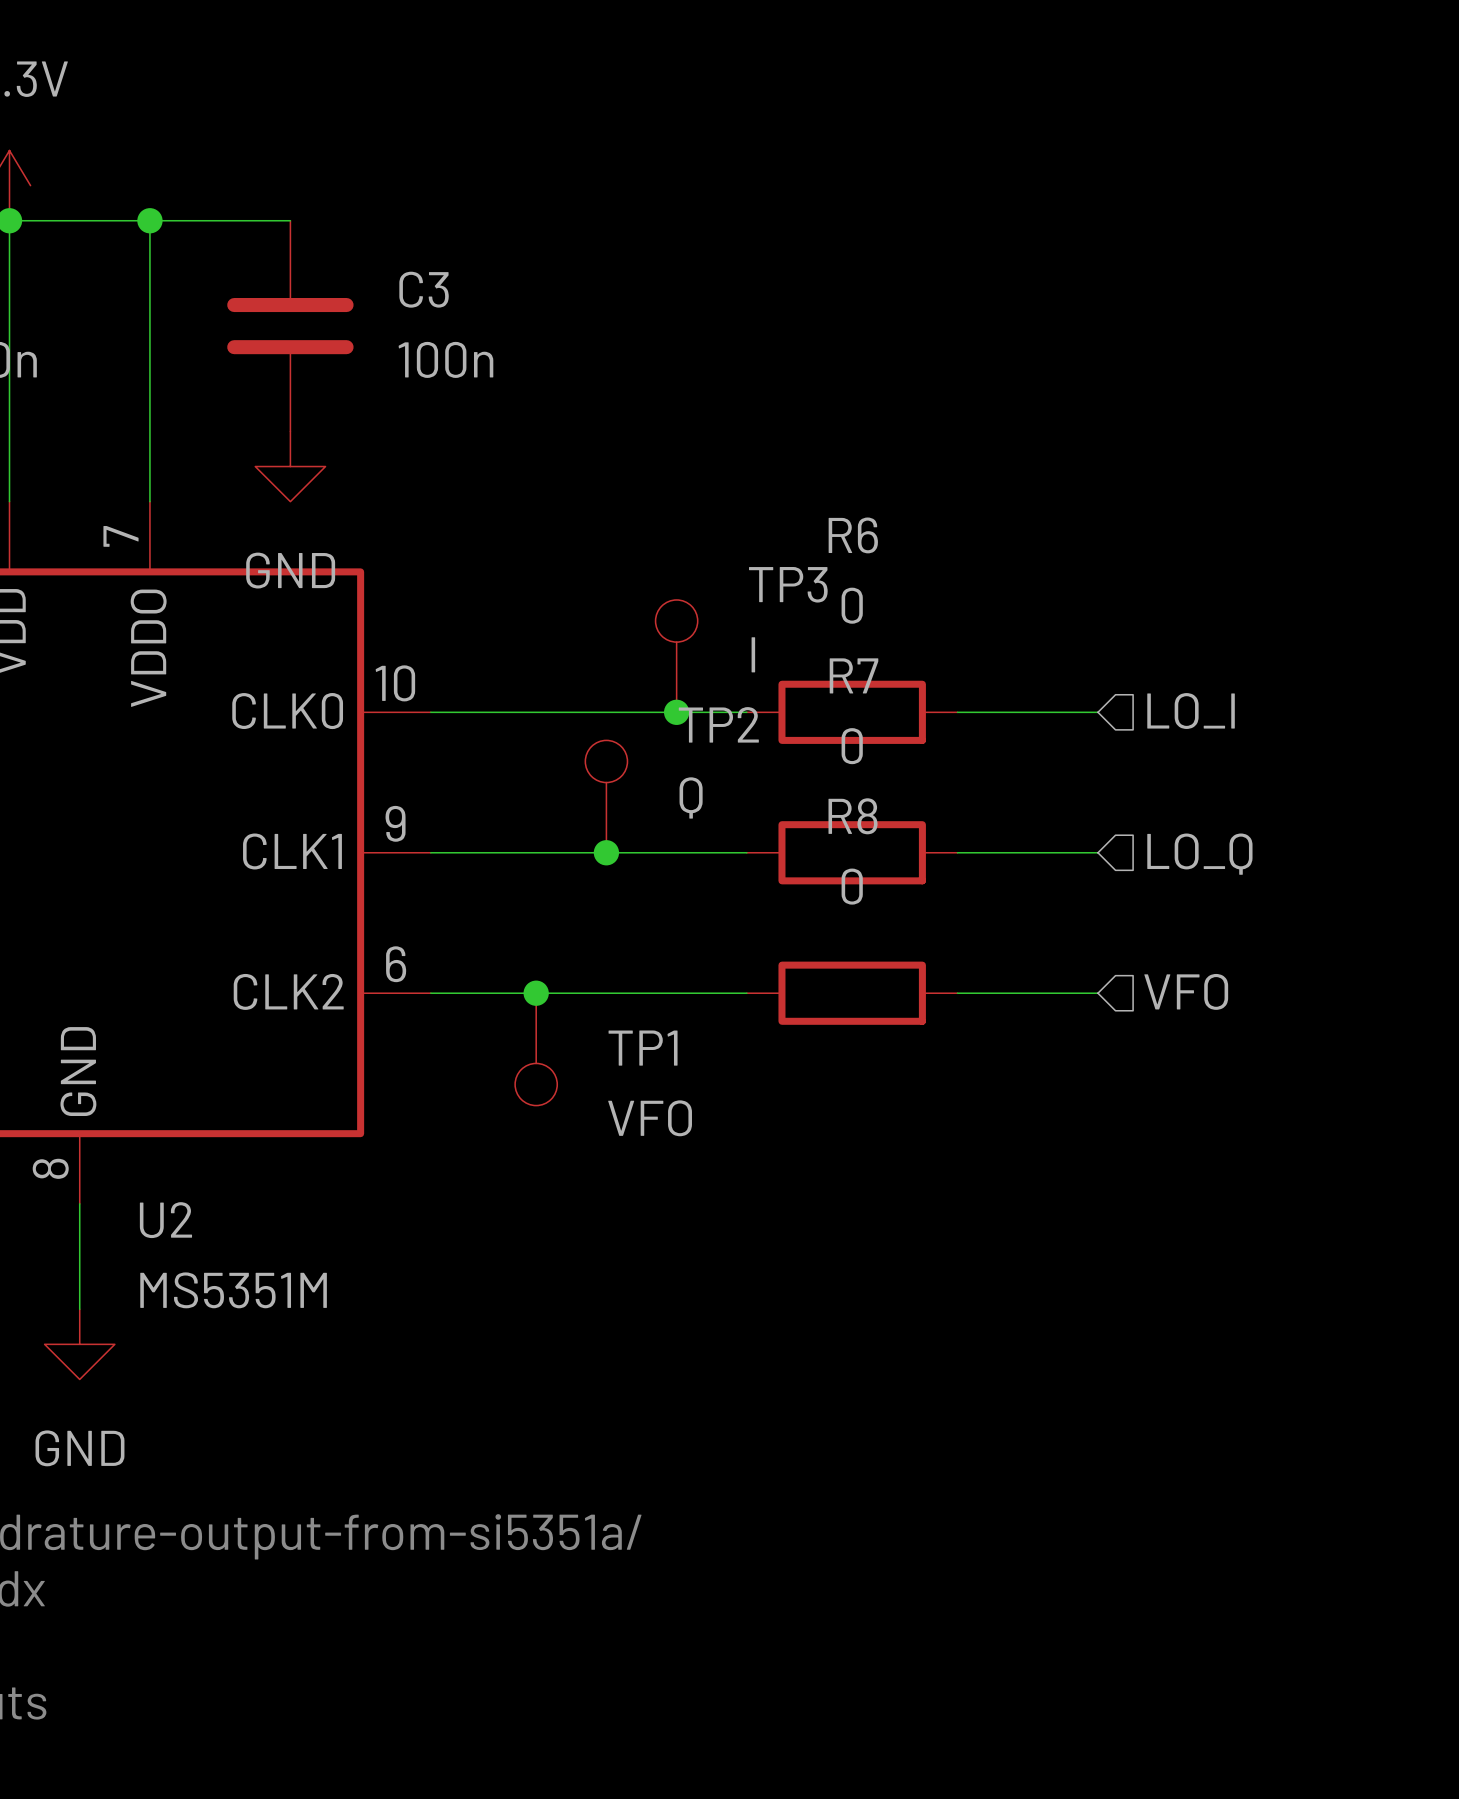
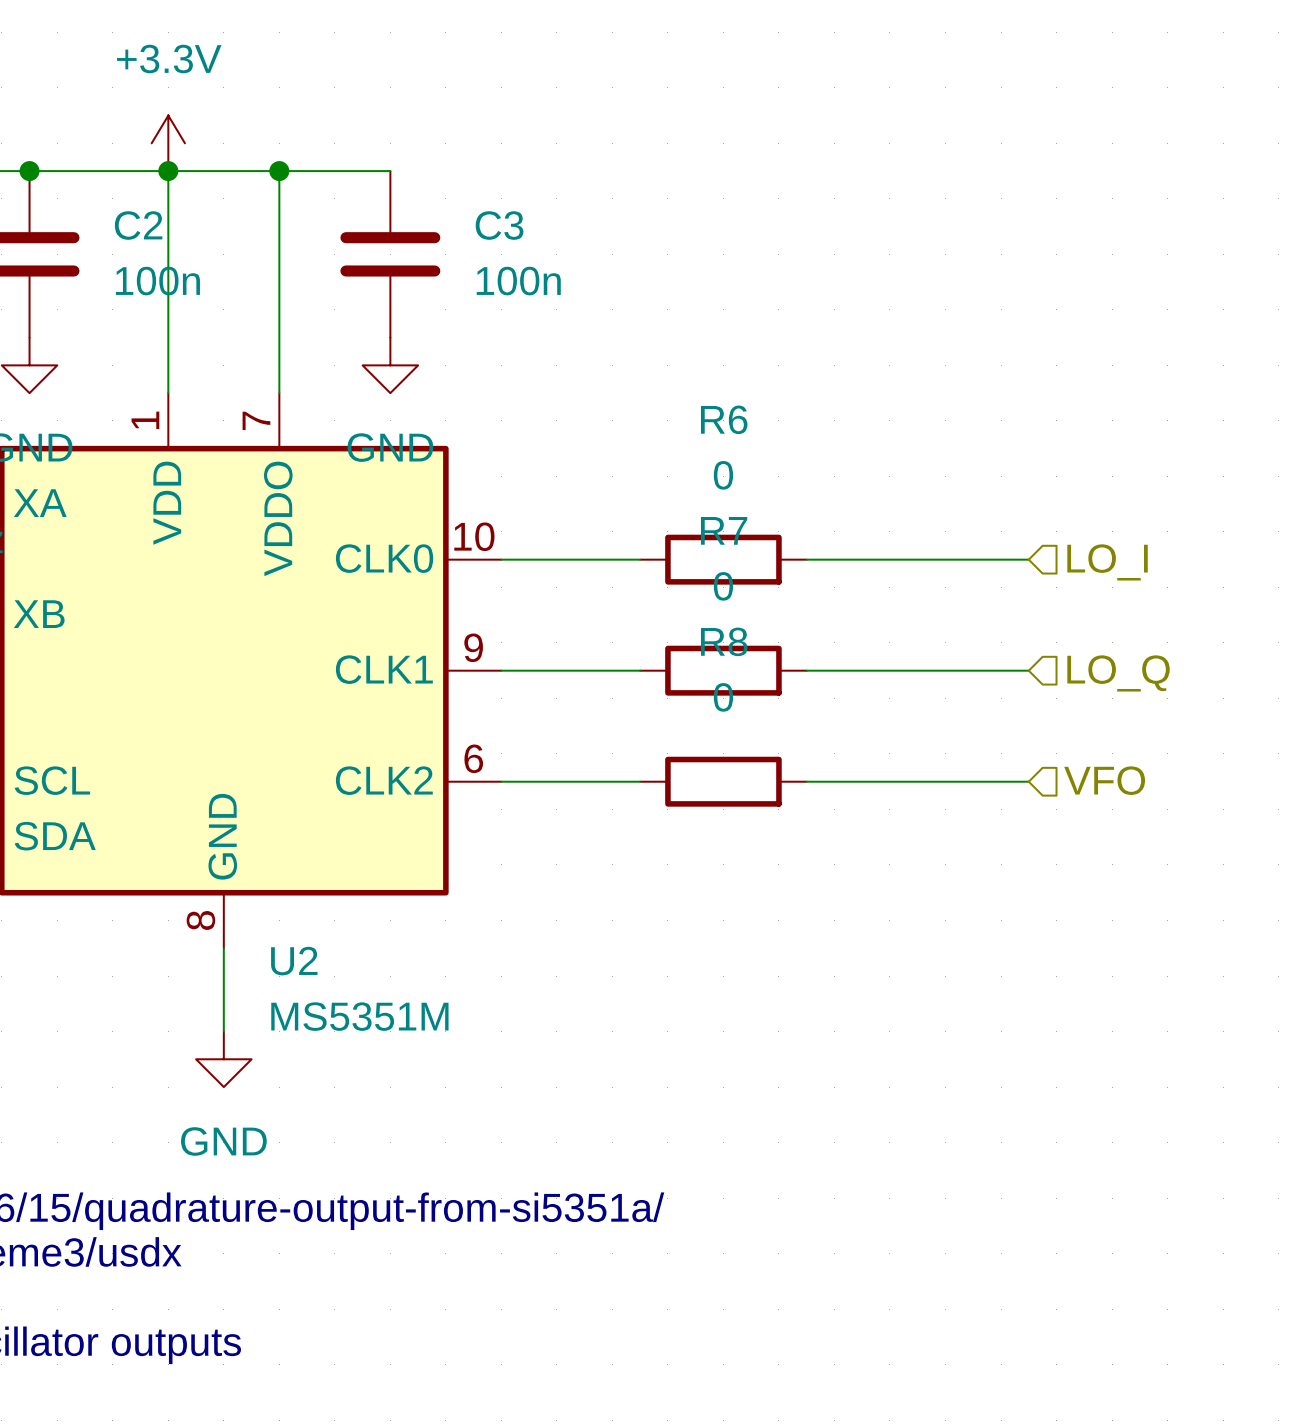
TP3: I (676, 656) -> none
wire: (606, 712) (746, 712) -> (806, 559) (917, 559)
junction: (676, 712) -> none
R6 position: (852, 712) -> (723, 559)
TP2: Q (606, 796) -> none
wire: (606, 852) (746, 852) -> (806, 670) (917, 670)
junction: (606, 852) -> none
R7 position: (852, 852) -> (723, 670)
junction: (536, 993) -> none
wire: (606, 993) (746, 993) -> (806, 781) (917, 781)
R8 position: (852, 993) -> (723, 781)
TP1: VFO (536, 1049) -> none

